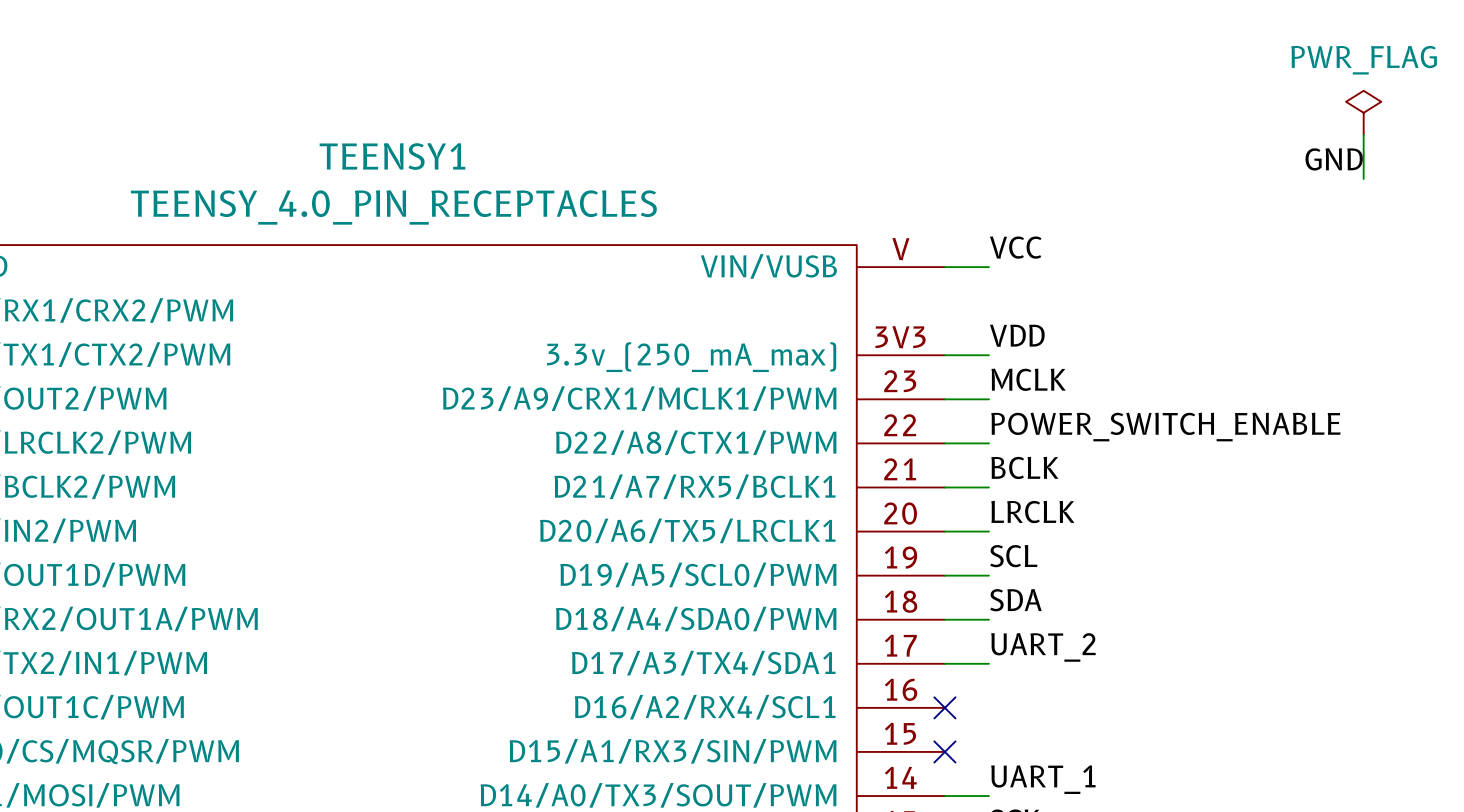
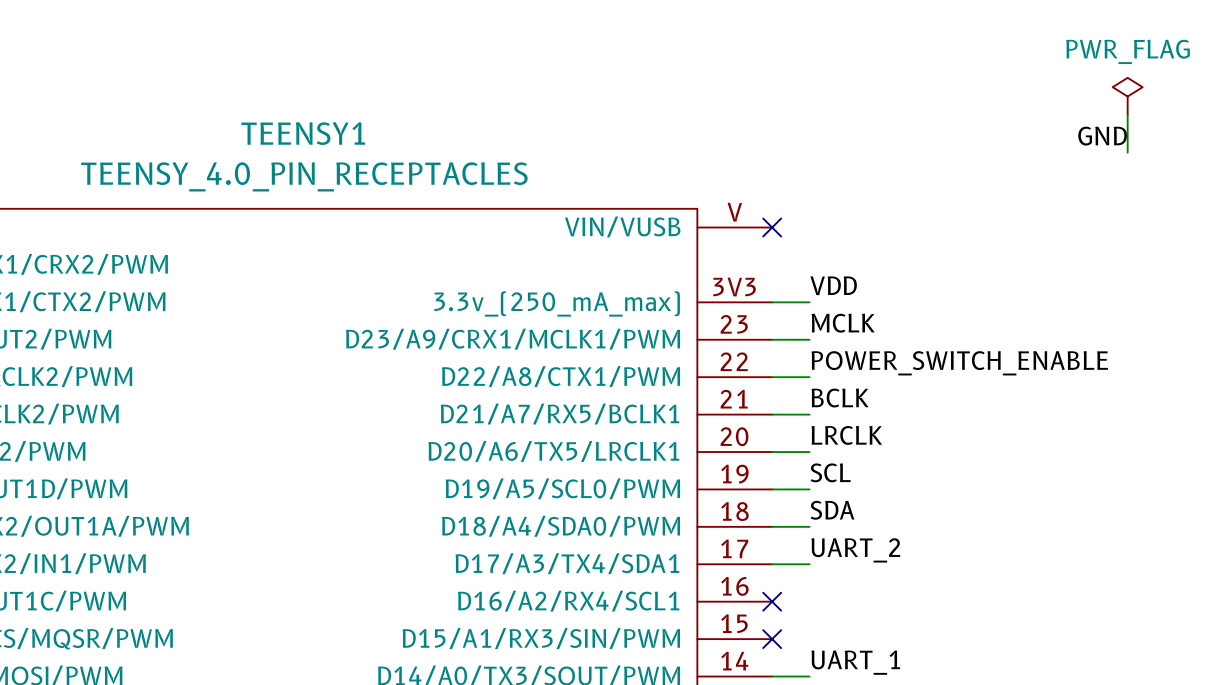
label: VCC (1015, 247) -> none
wire: (944, 267) (989, 267) -> none
no-connect mark: none -> (772, 227)

